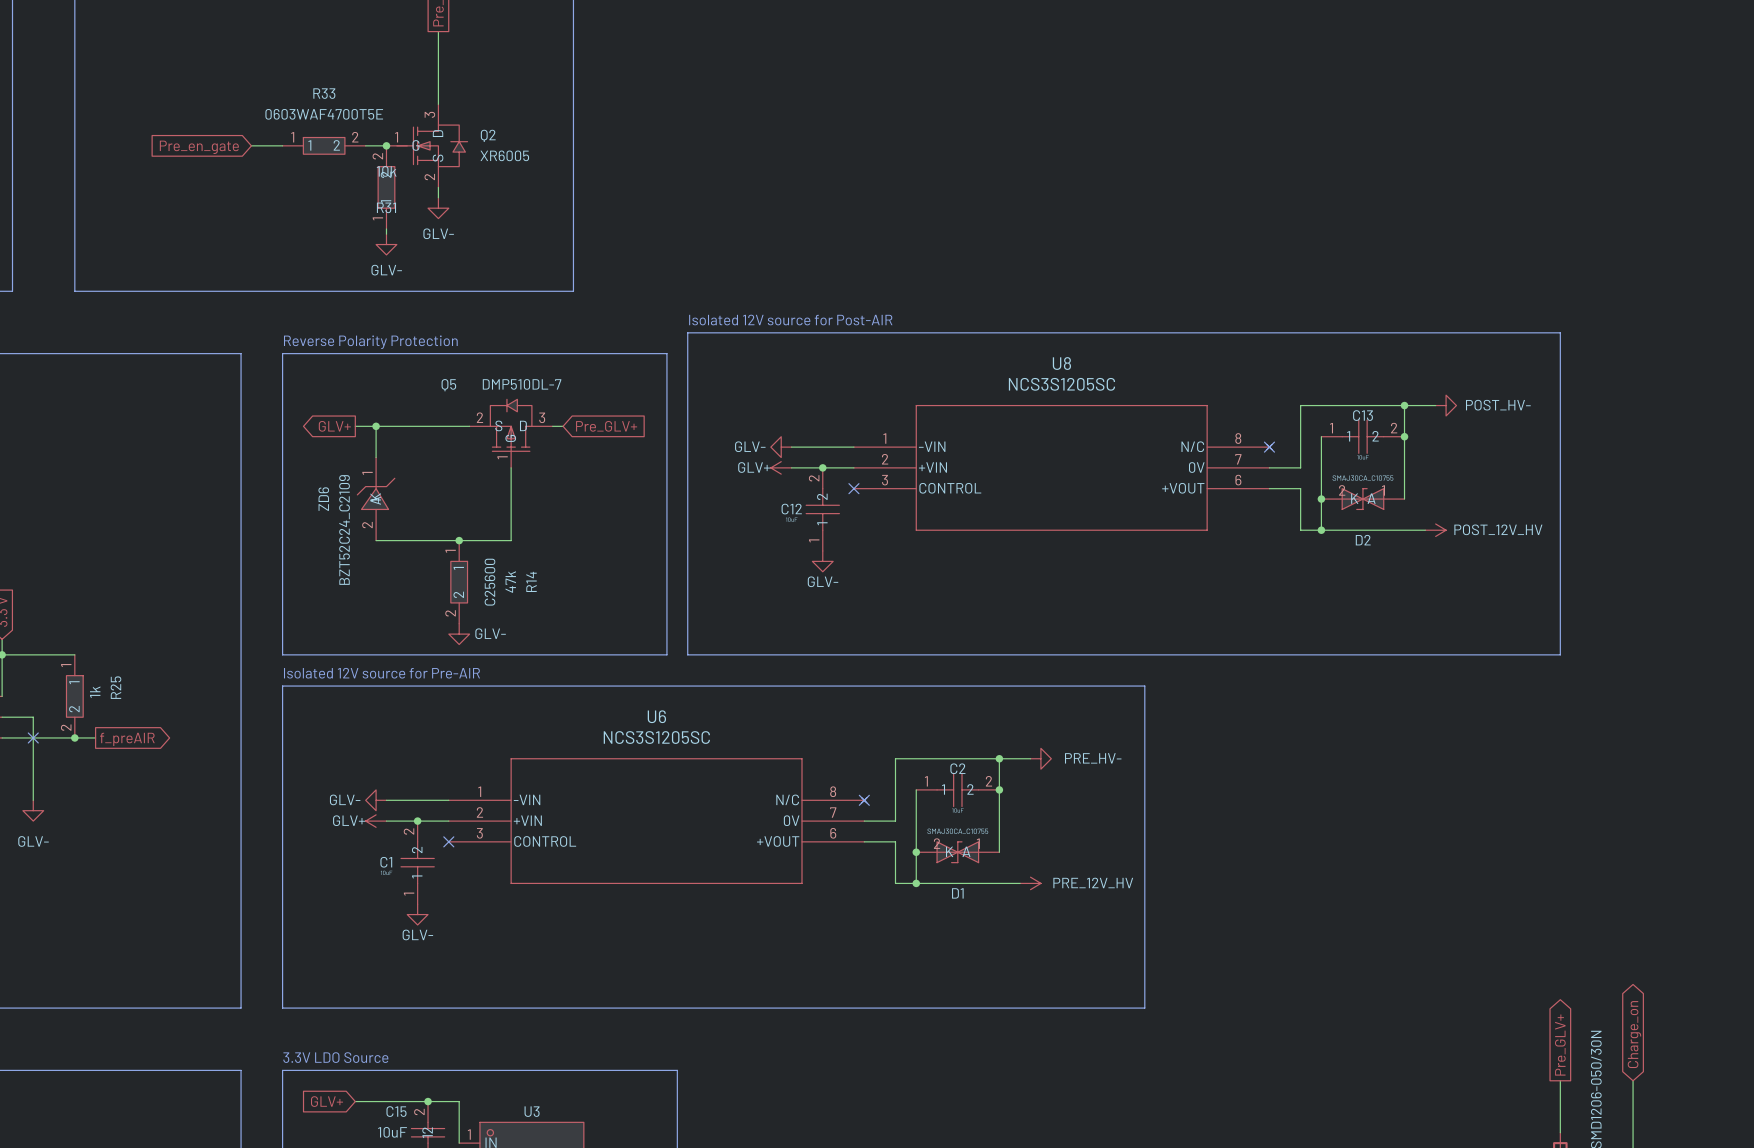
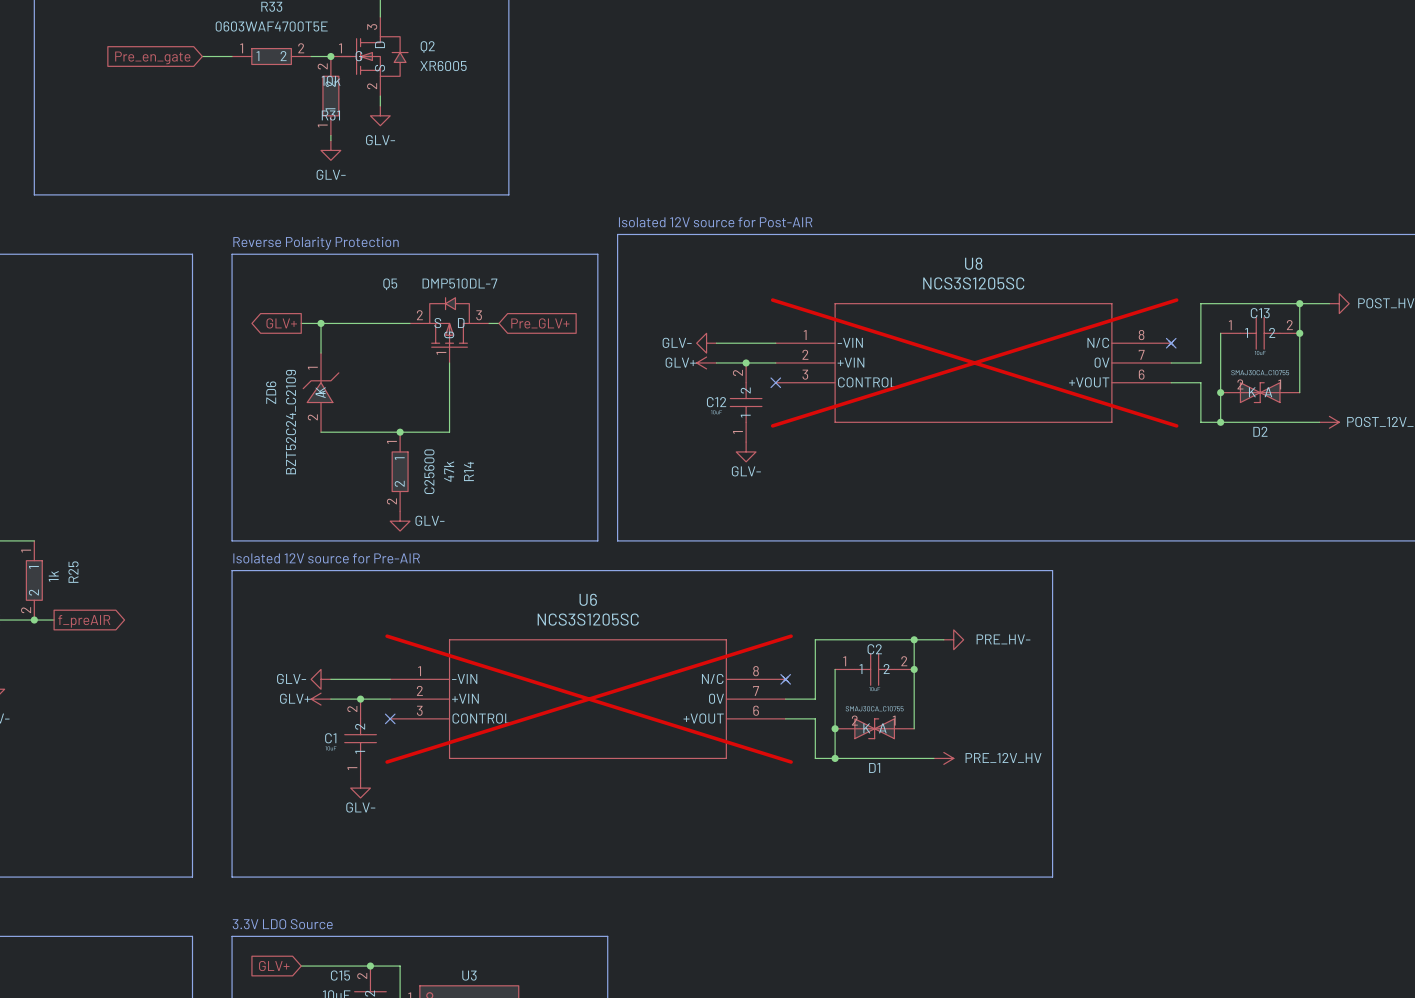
U8 do-not-place cross: none -> (974, 362)
U6 do-not-place cross: none -> (589, 699)

